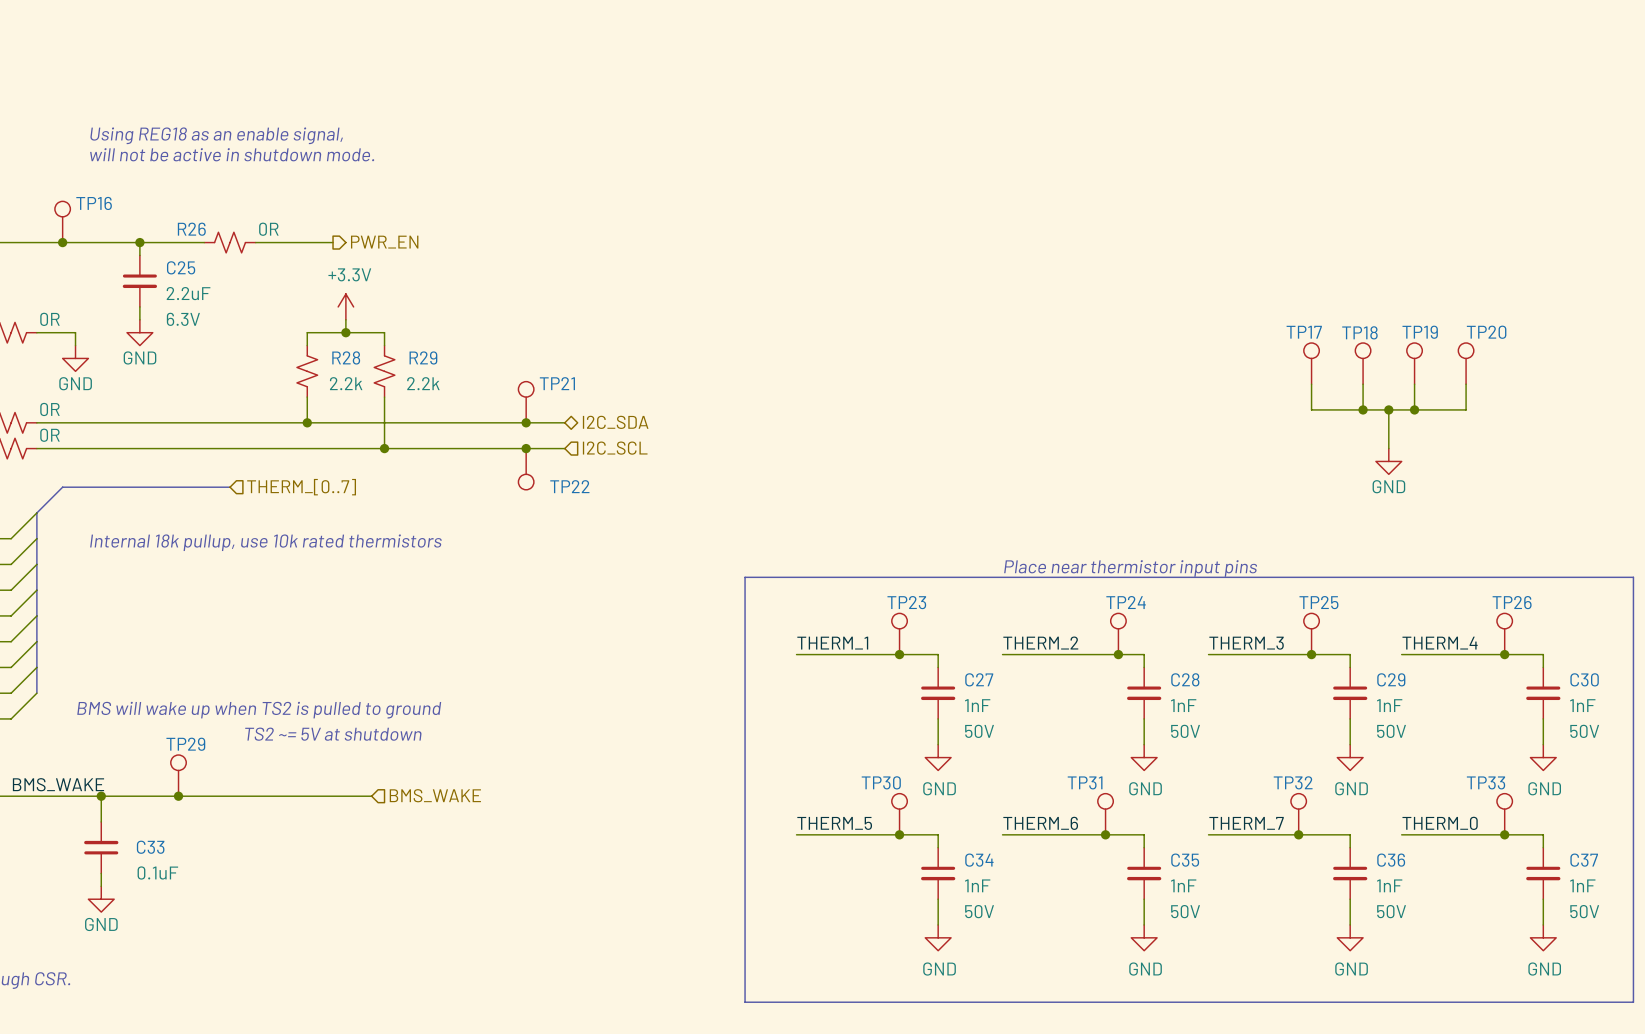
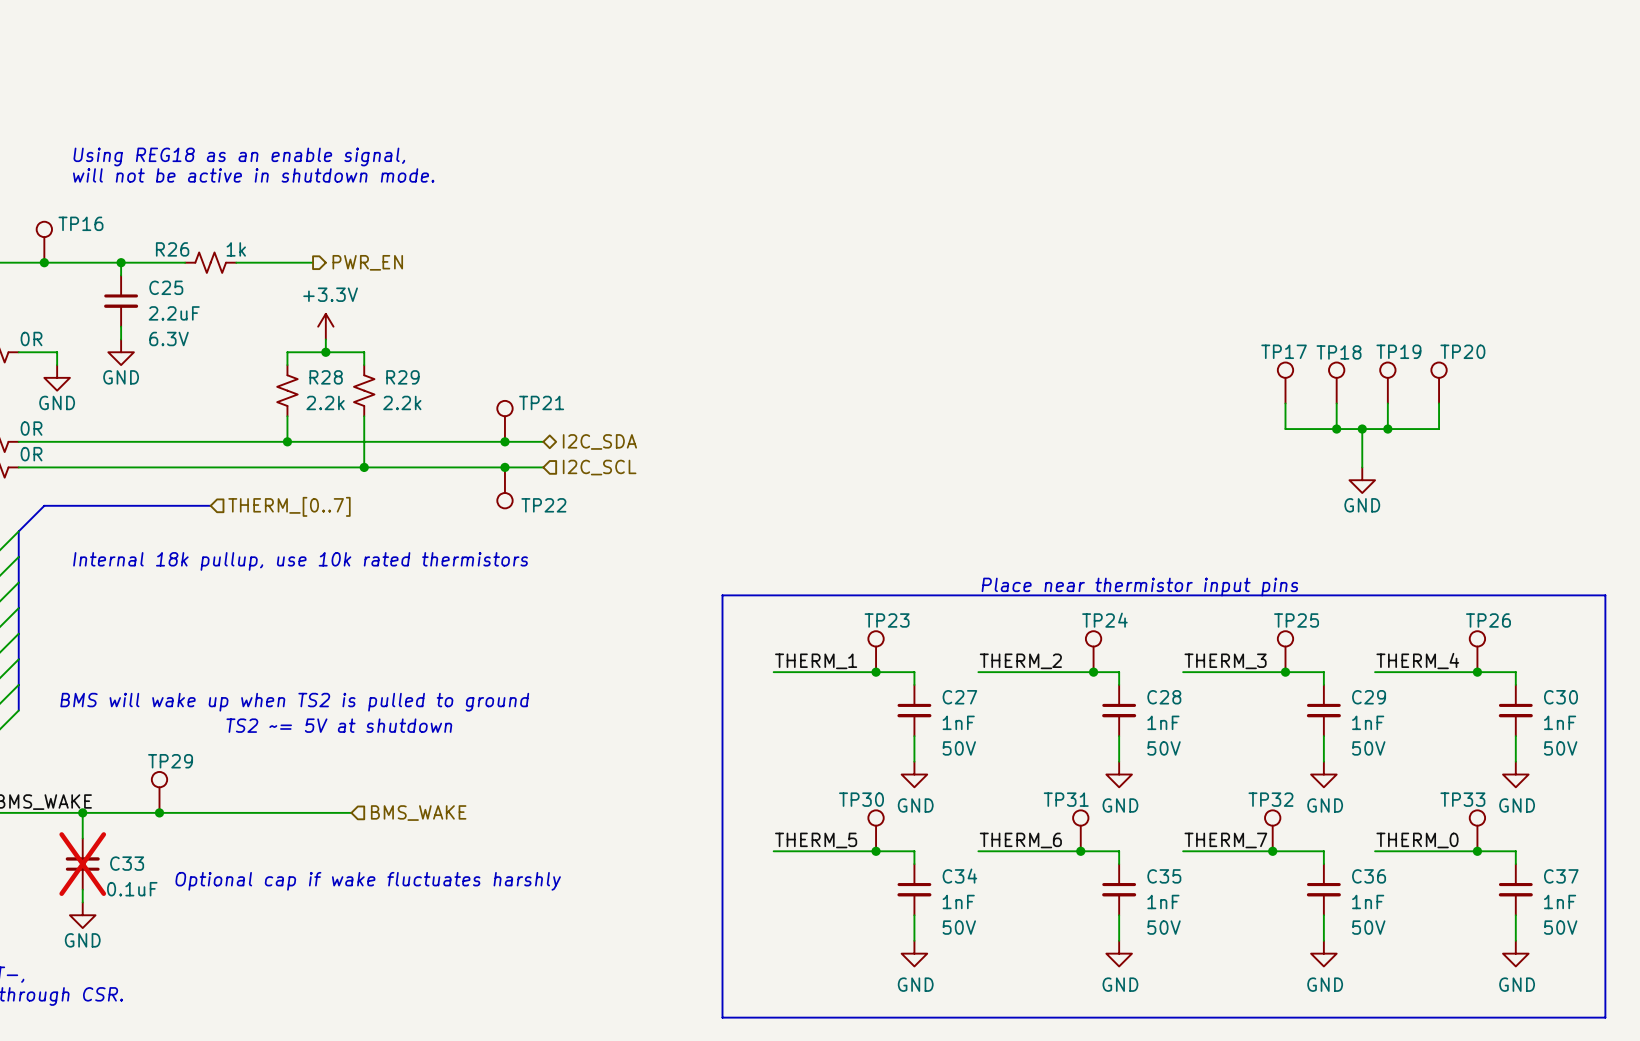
R26 value: 0R (268, 229) -> 1k (236, 249)
text position: BMS will wake up when TS2 is pulled to ground (259, 710) -> BMS will wake up when TS2 is pulled to ground (294, 702)
text position: TS2 ~= 5V at shutdown (333, 734) -> TS2 ~= 5V at shutdown (339, 725)
C33 do-not-place cross: none -> (82, 864)
text: none -> Optional cap if wake fluctuates harshly (368, 881)

